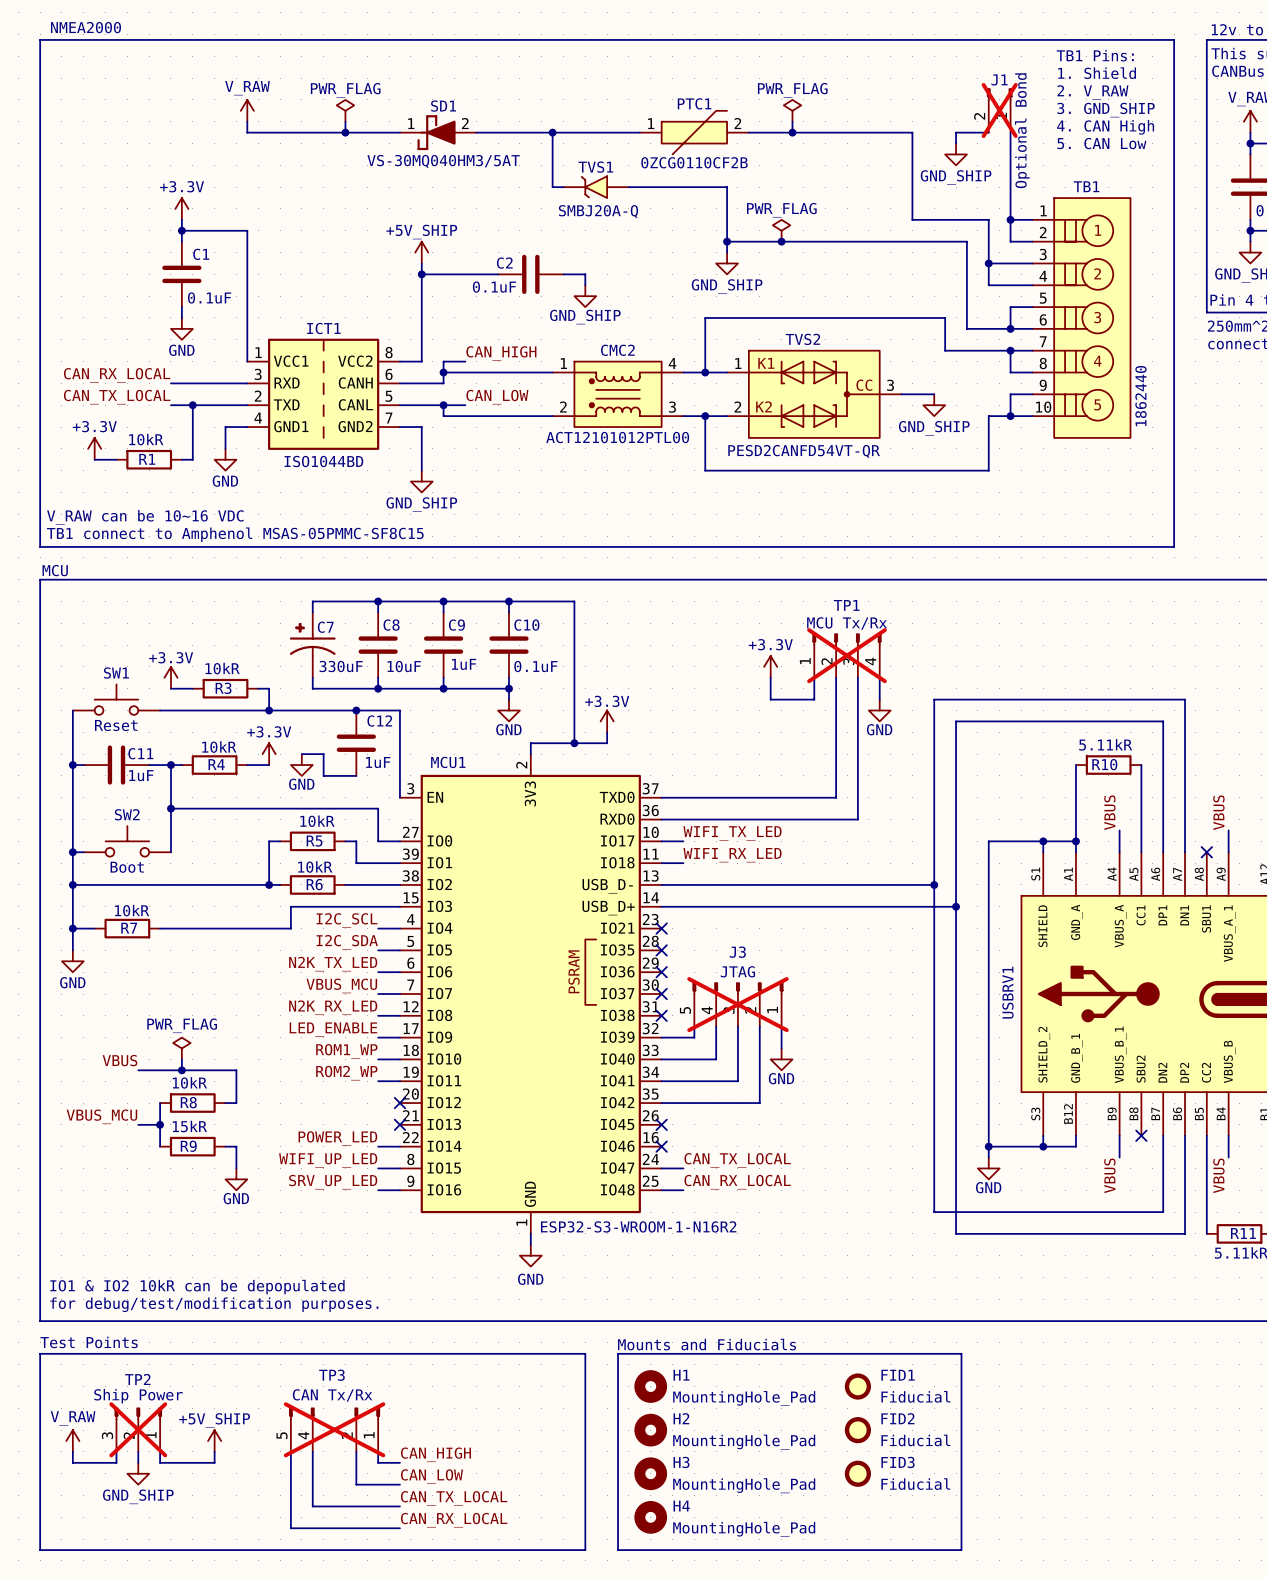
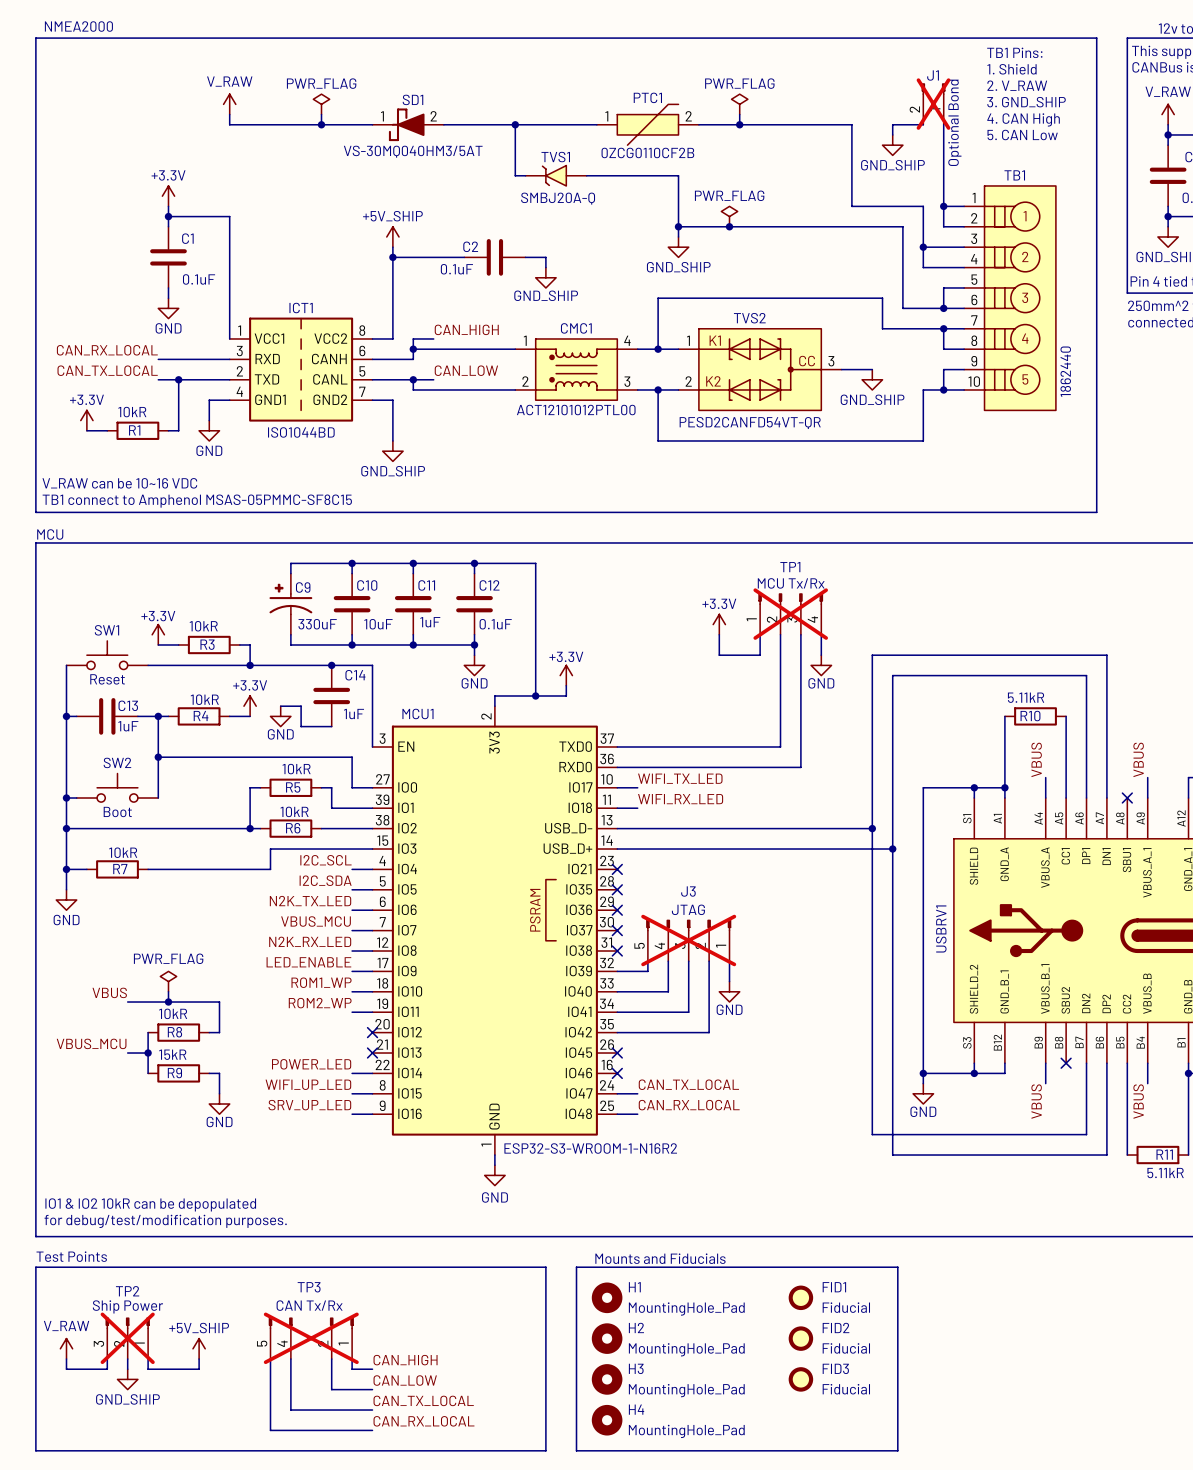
CMC2 name: CMC2 (617, 350) -> CMC1 (576, 328)
C8 name: C8 (391, 625) -> C10 (367, 585)
C9 name: C9 (456, 625) -> C11 (426, 585)
C10 name: C10 (526, 625) -> C12 (489, 585)
C7 name: C7 (325, 627) -> C9 (303, 587)
C12 name: C12 (379, 721) -> C14 (355, 675)
C11 name: C11 (140, 753) -> C13 (128, 705)

